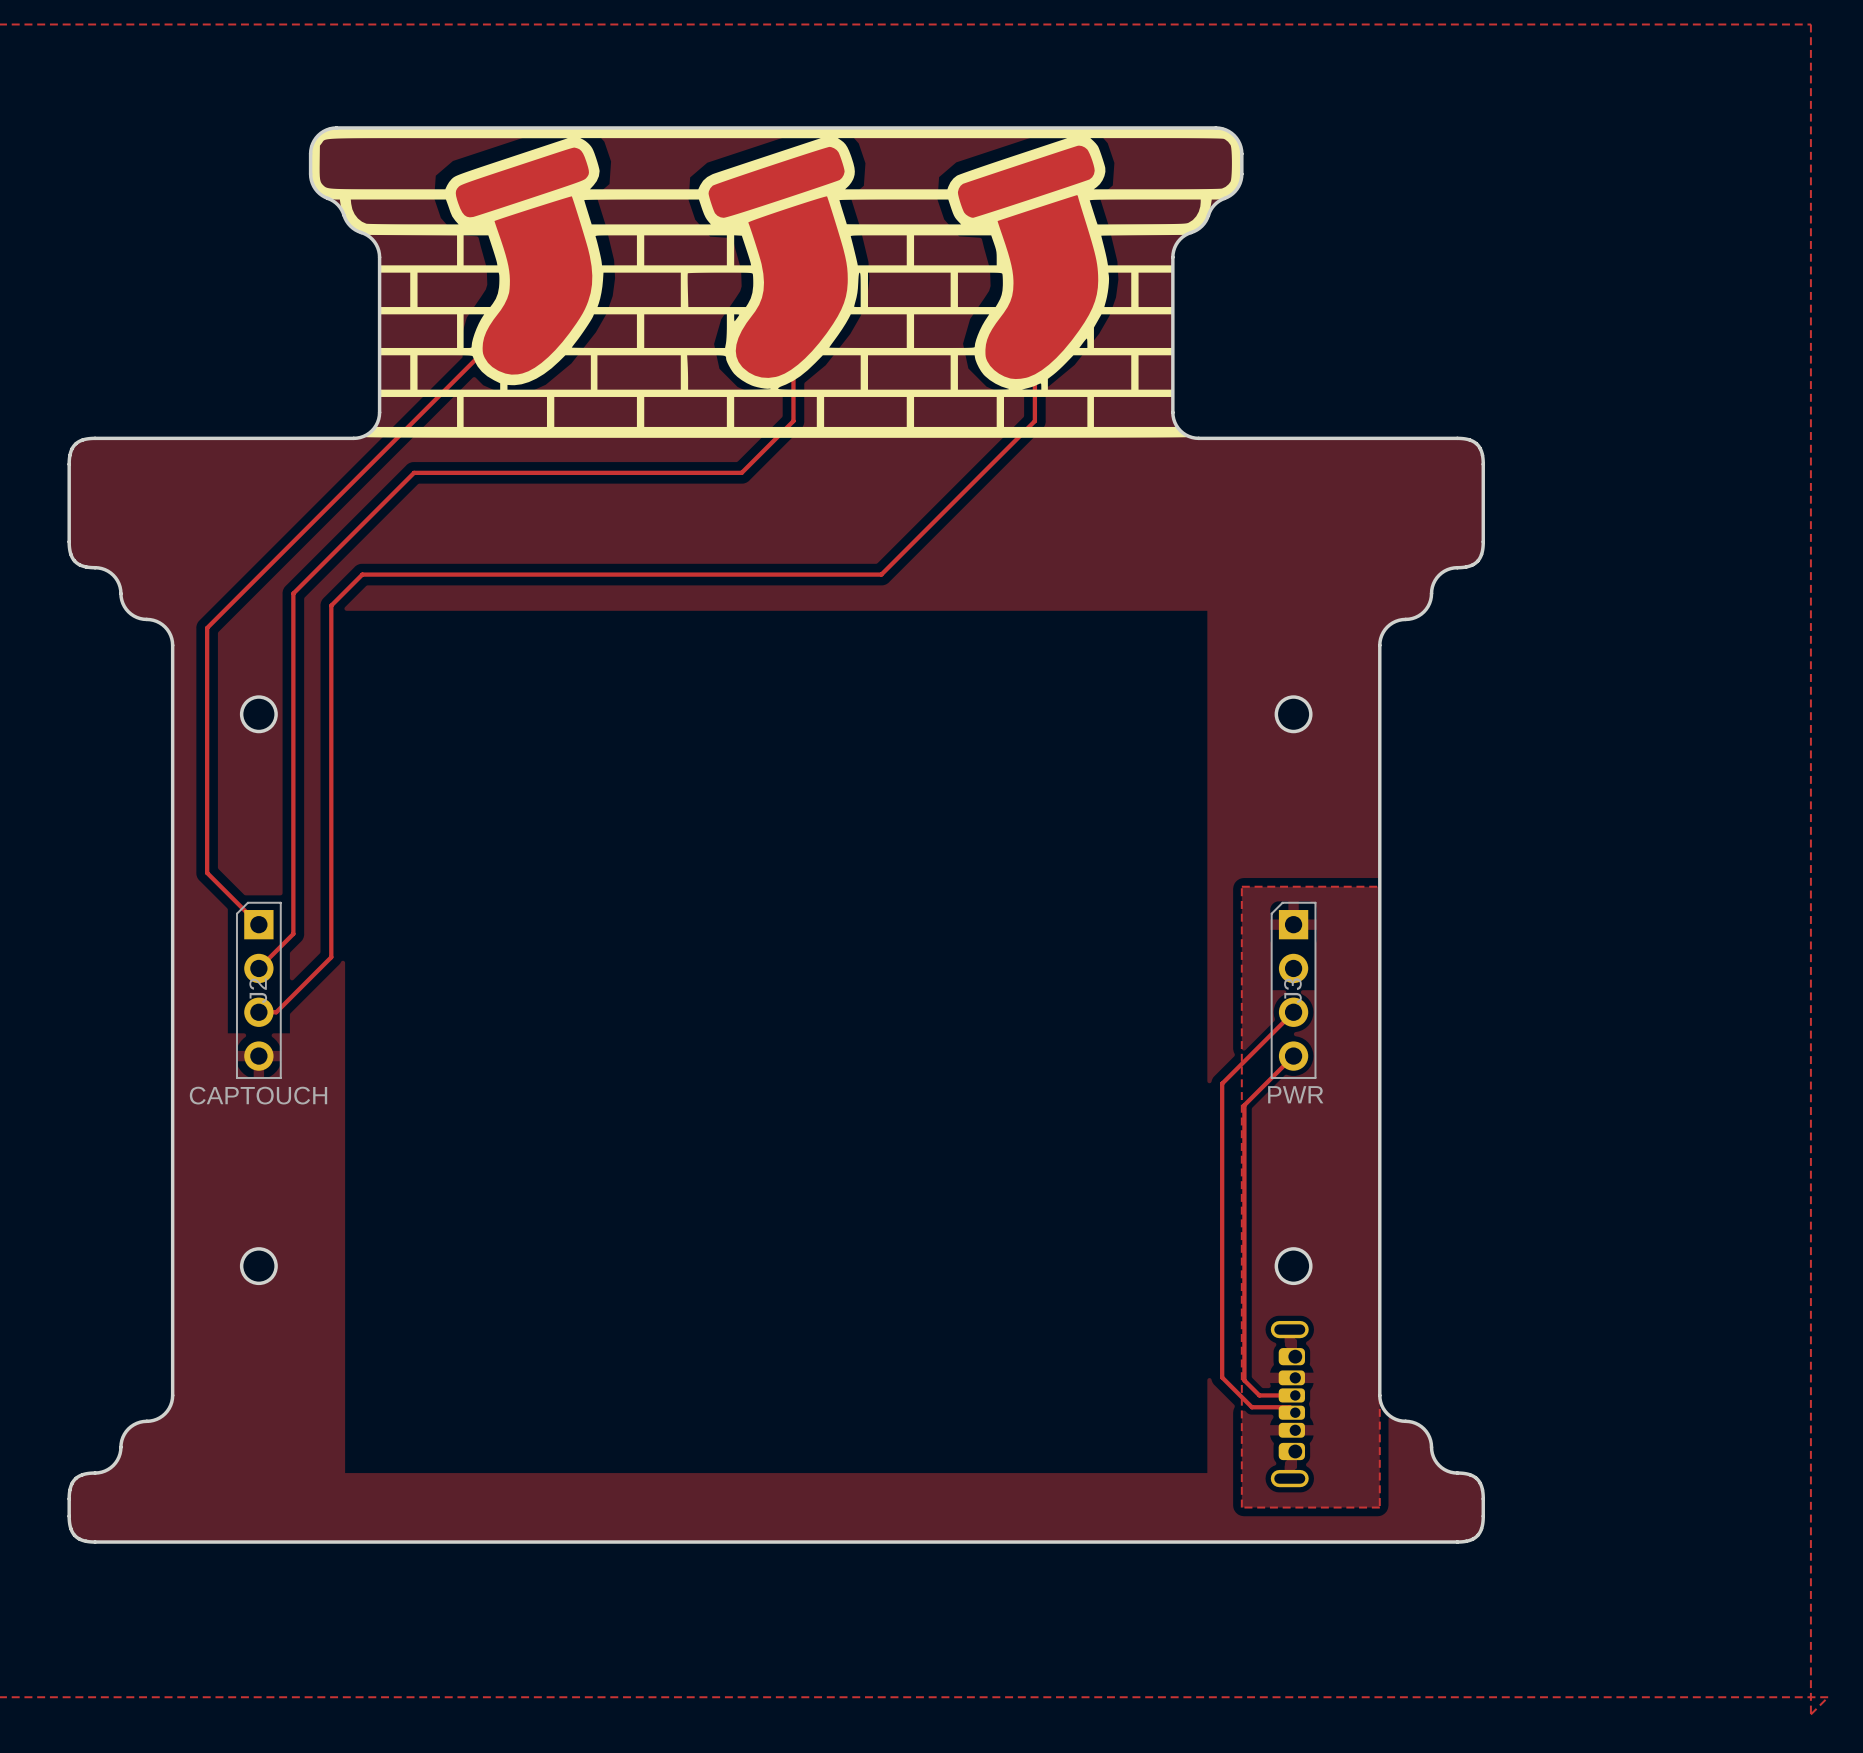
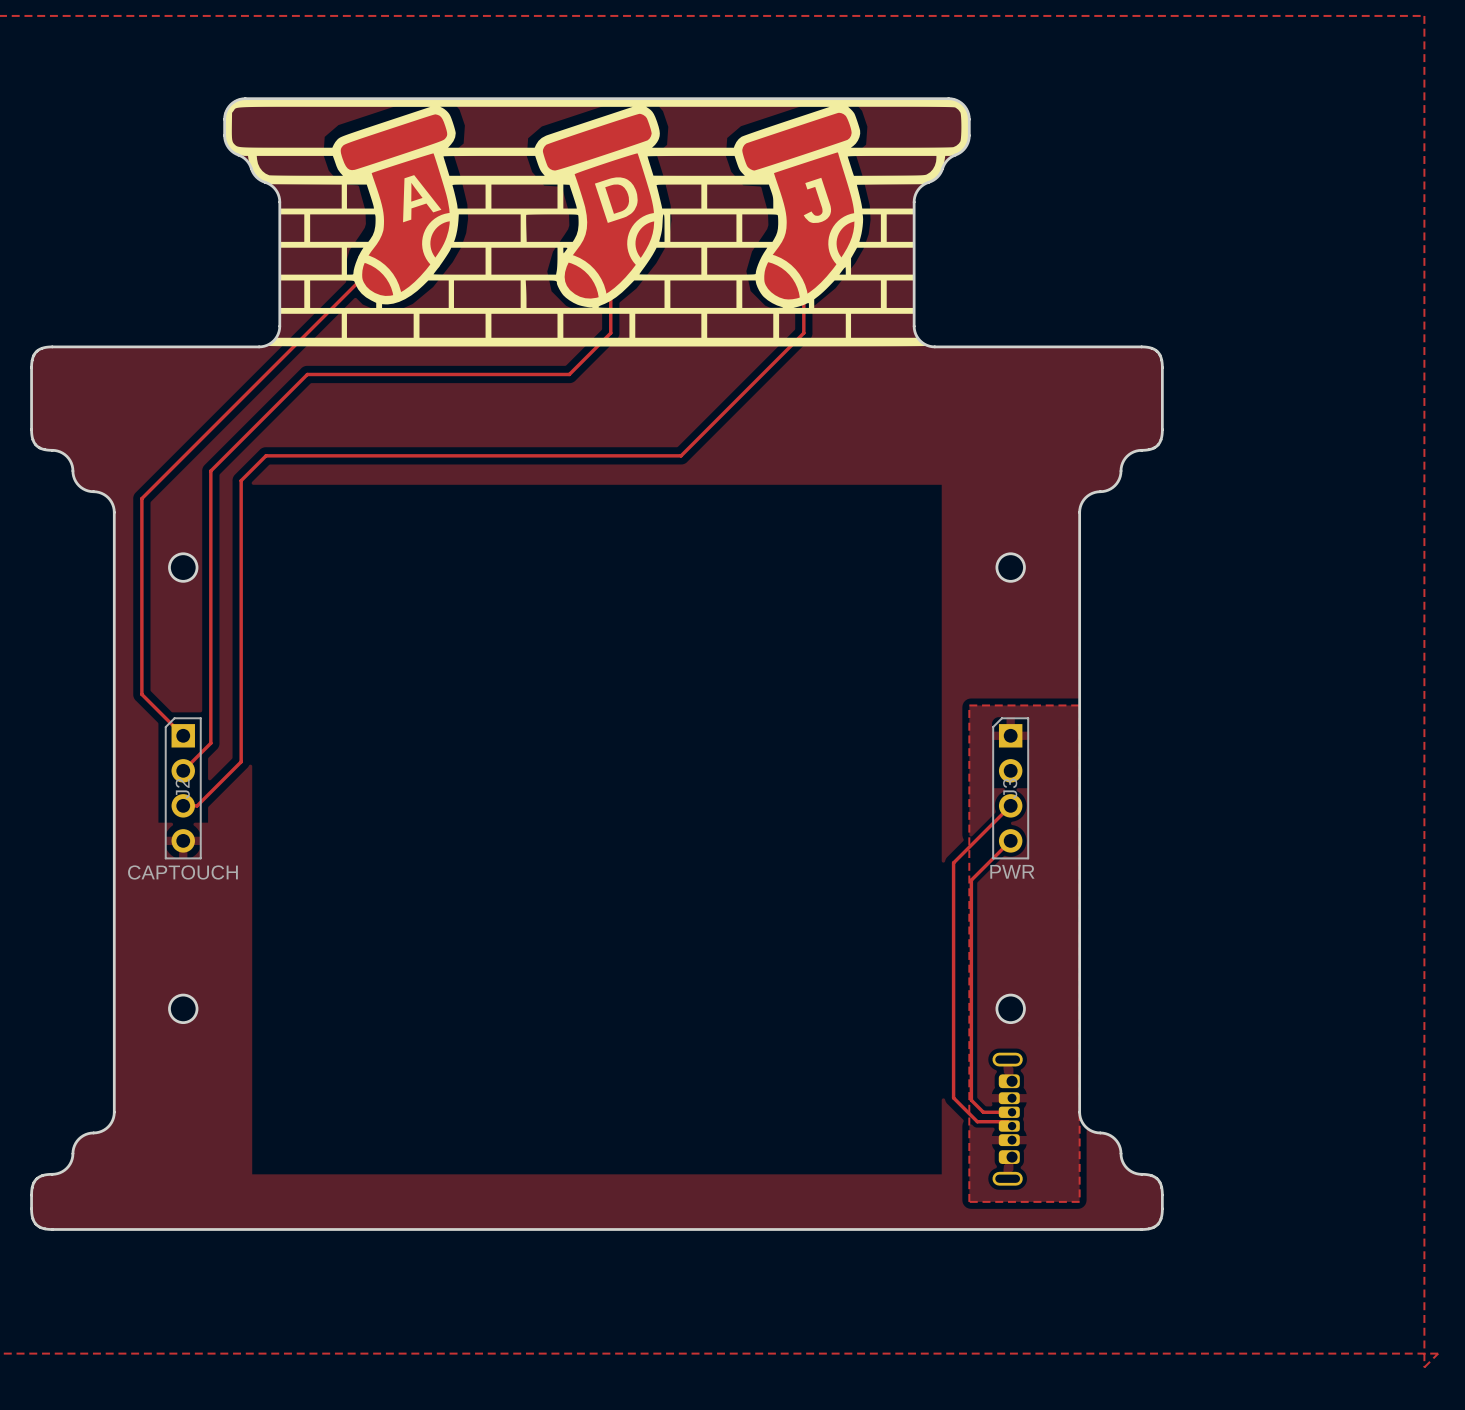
text: none -> A (422, 198)
text: none -> D (616, 199)
text: none -> J (817, 200)
line: none -> (452, 216) (437, 222) (427, 234) (427, 250) (435, 264)
line: none -> (657, 216) (642, 222) (632, 234) (632, 250) (641, 264)
line: none -> (858, 216) (843, 222) (833, 234) (833, 250) (842, 264)
line: none -> (362, 257) (377, 264) (386, 272) (392, 281) (397, 297)
line: none -> (567, 257) (578, 261) (591, 272) (597, 281) (602, 297)
line: none -> (768, 257) (779, 261) (792, 272) (801, 286) (803, 297)

